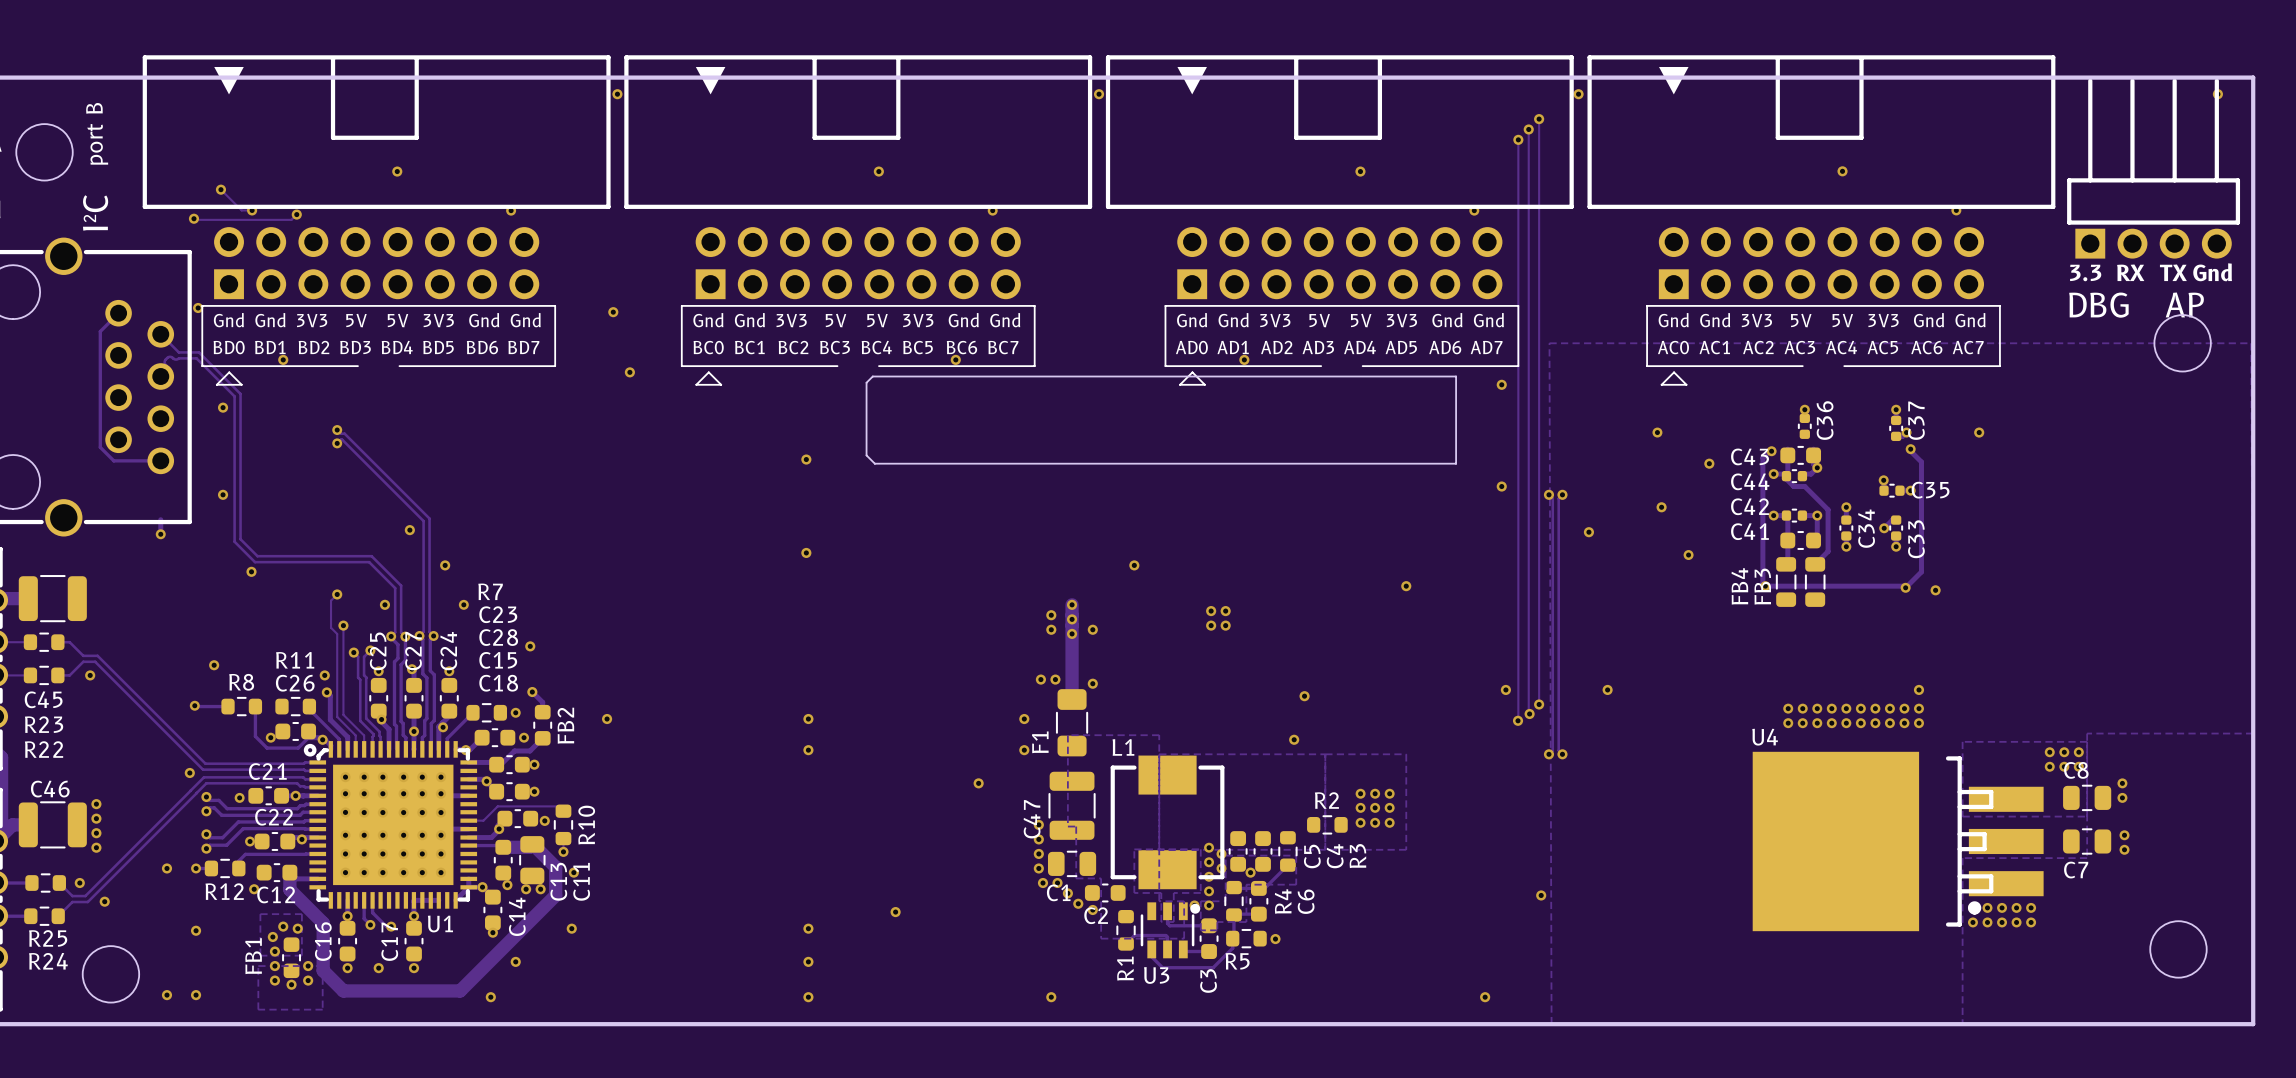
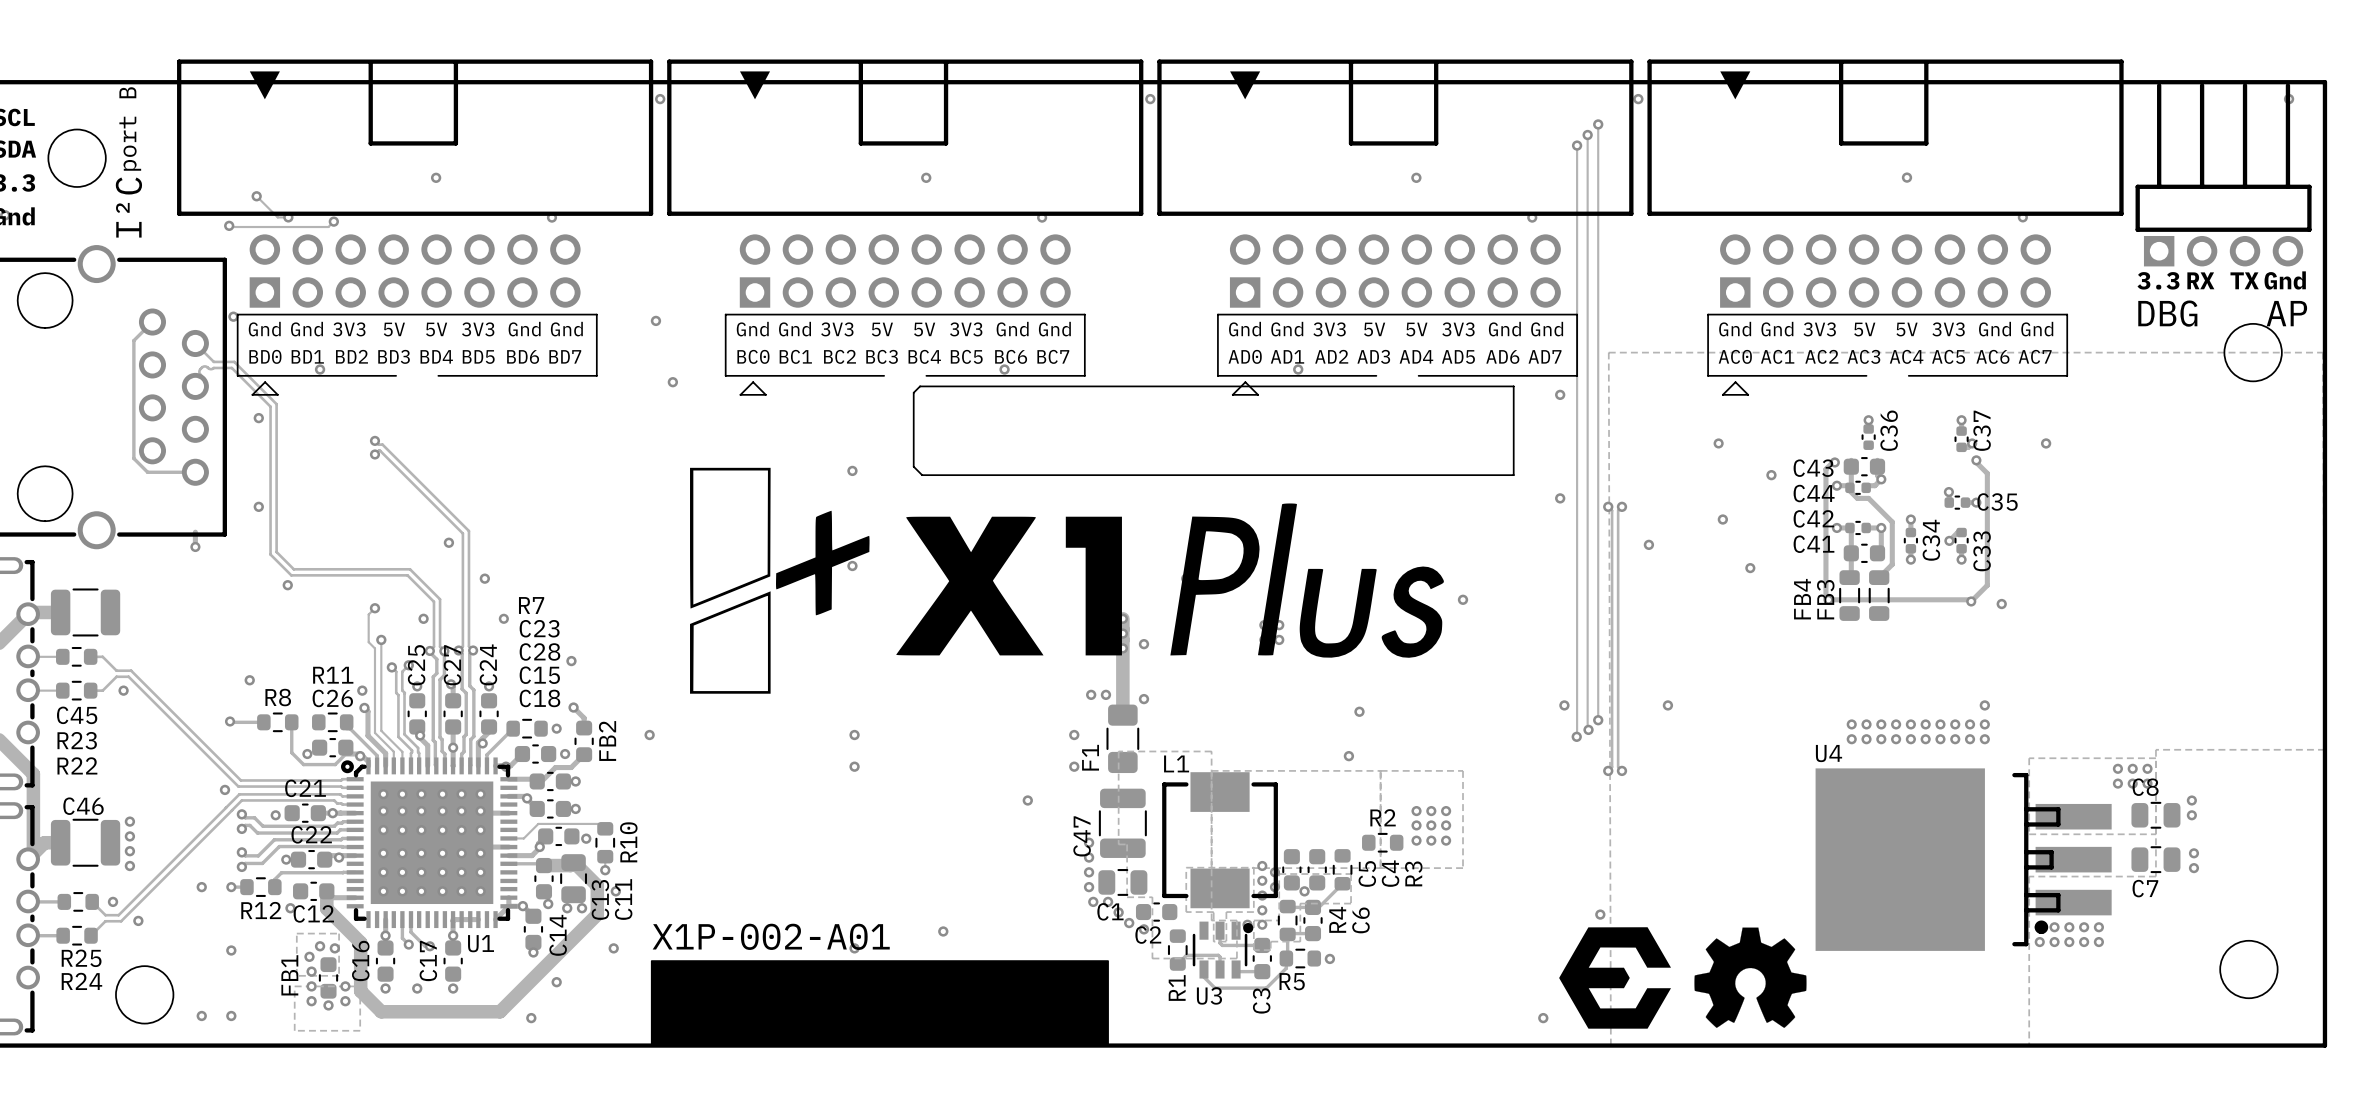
drawing: none -> [690, 467, 1444, 694]
drawing: none -> [1559, 927, 1672, 1029]
drawing: none -> [1694, 927, 1807, 1028]
text: none -> X1P-002-A01 (771, 936)
drawing: none -> [650, 960, 1109, 1047]

